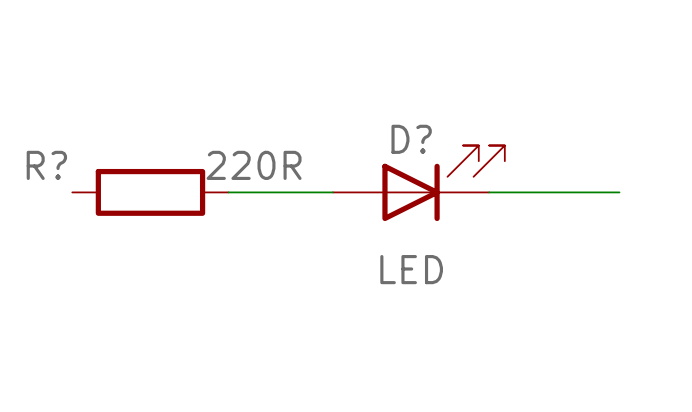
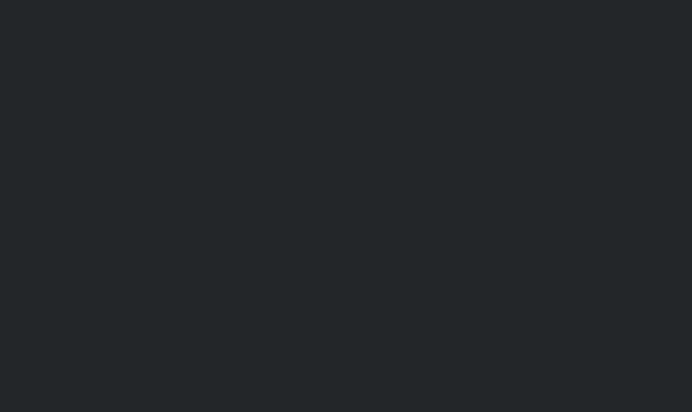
D?: LED (418, 183) -> none
R?: 220R (150, 192) -> none
wire: (228, 192) (332, 192) -> none
wire: (489, 192) (619, 192) -> none

